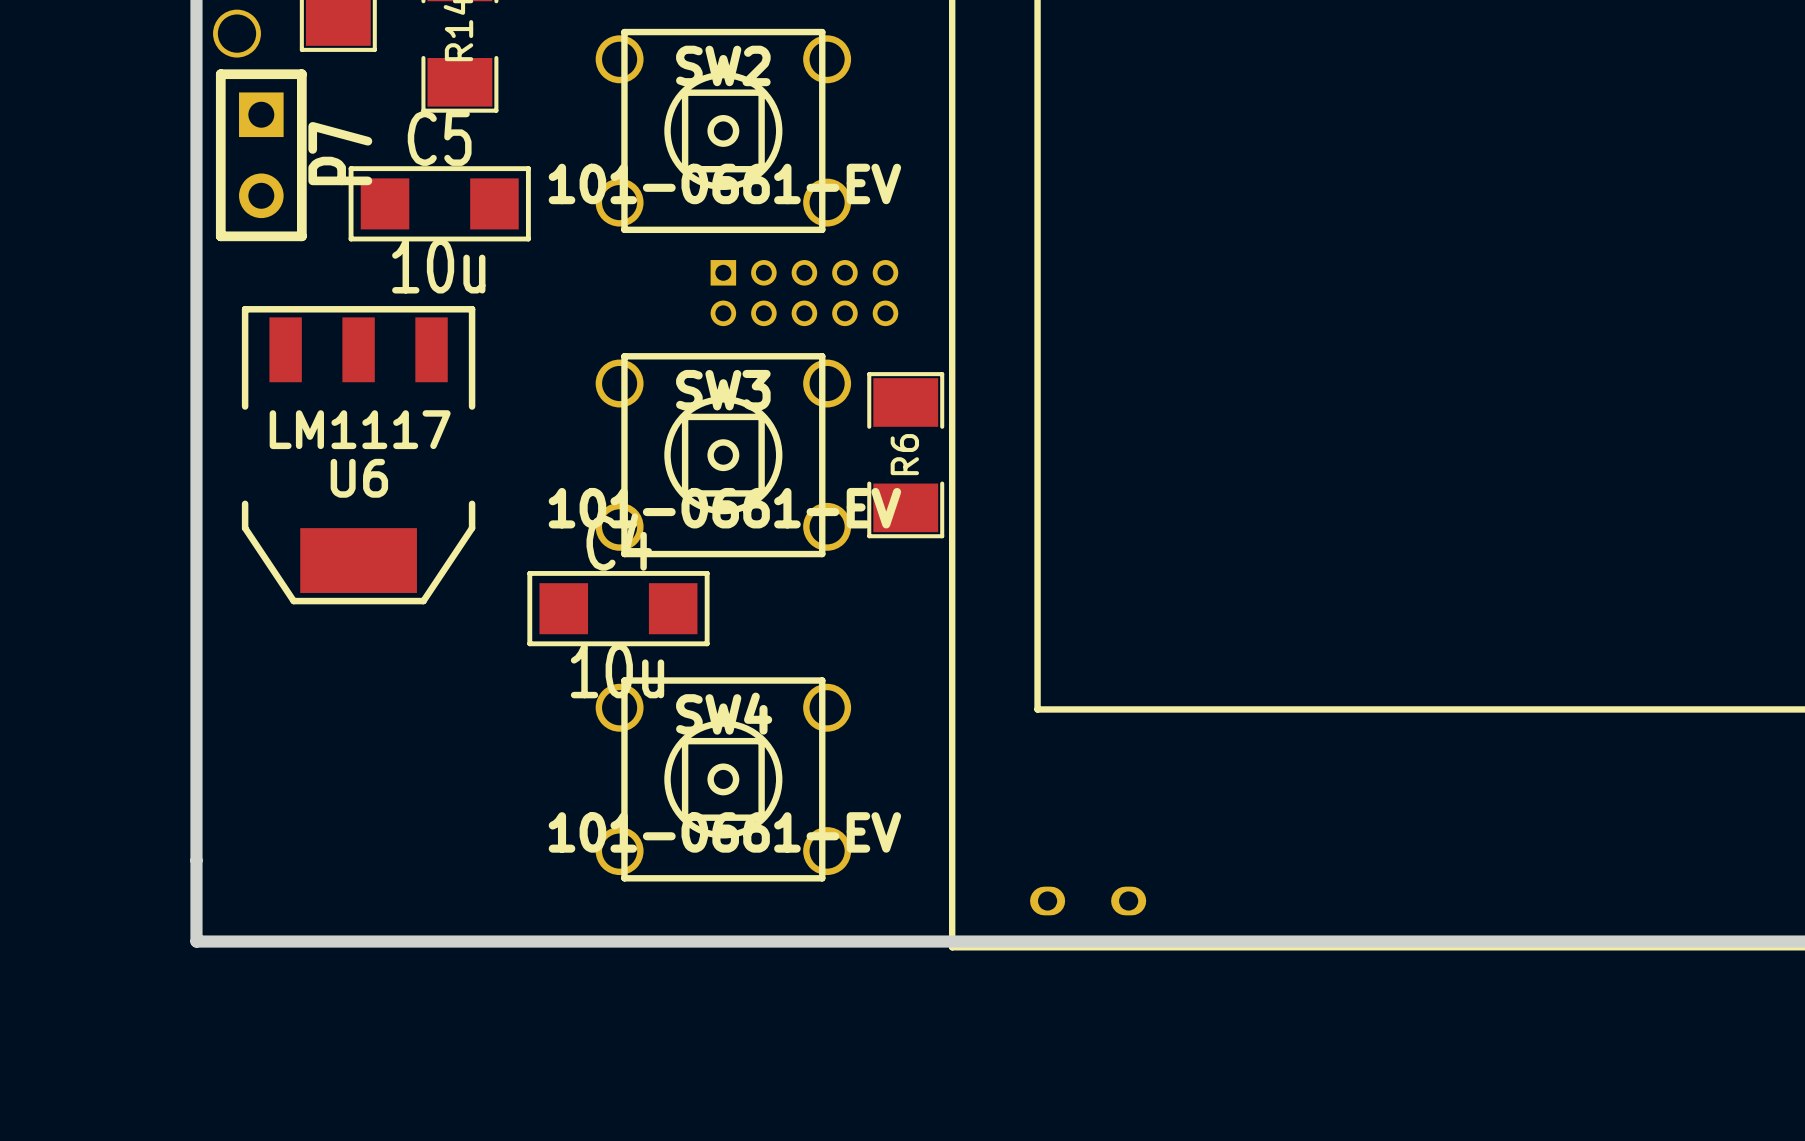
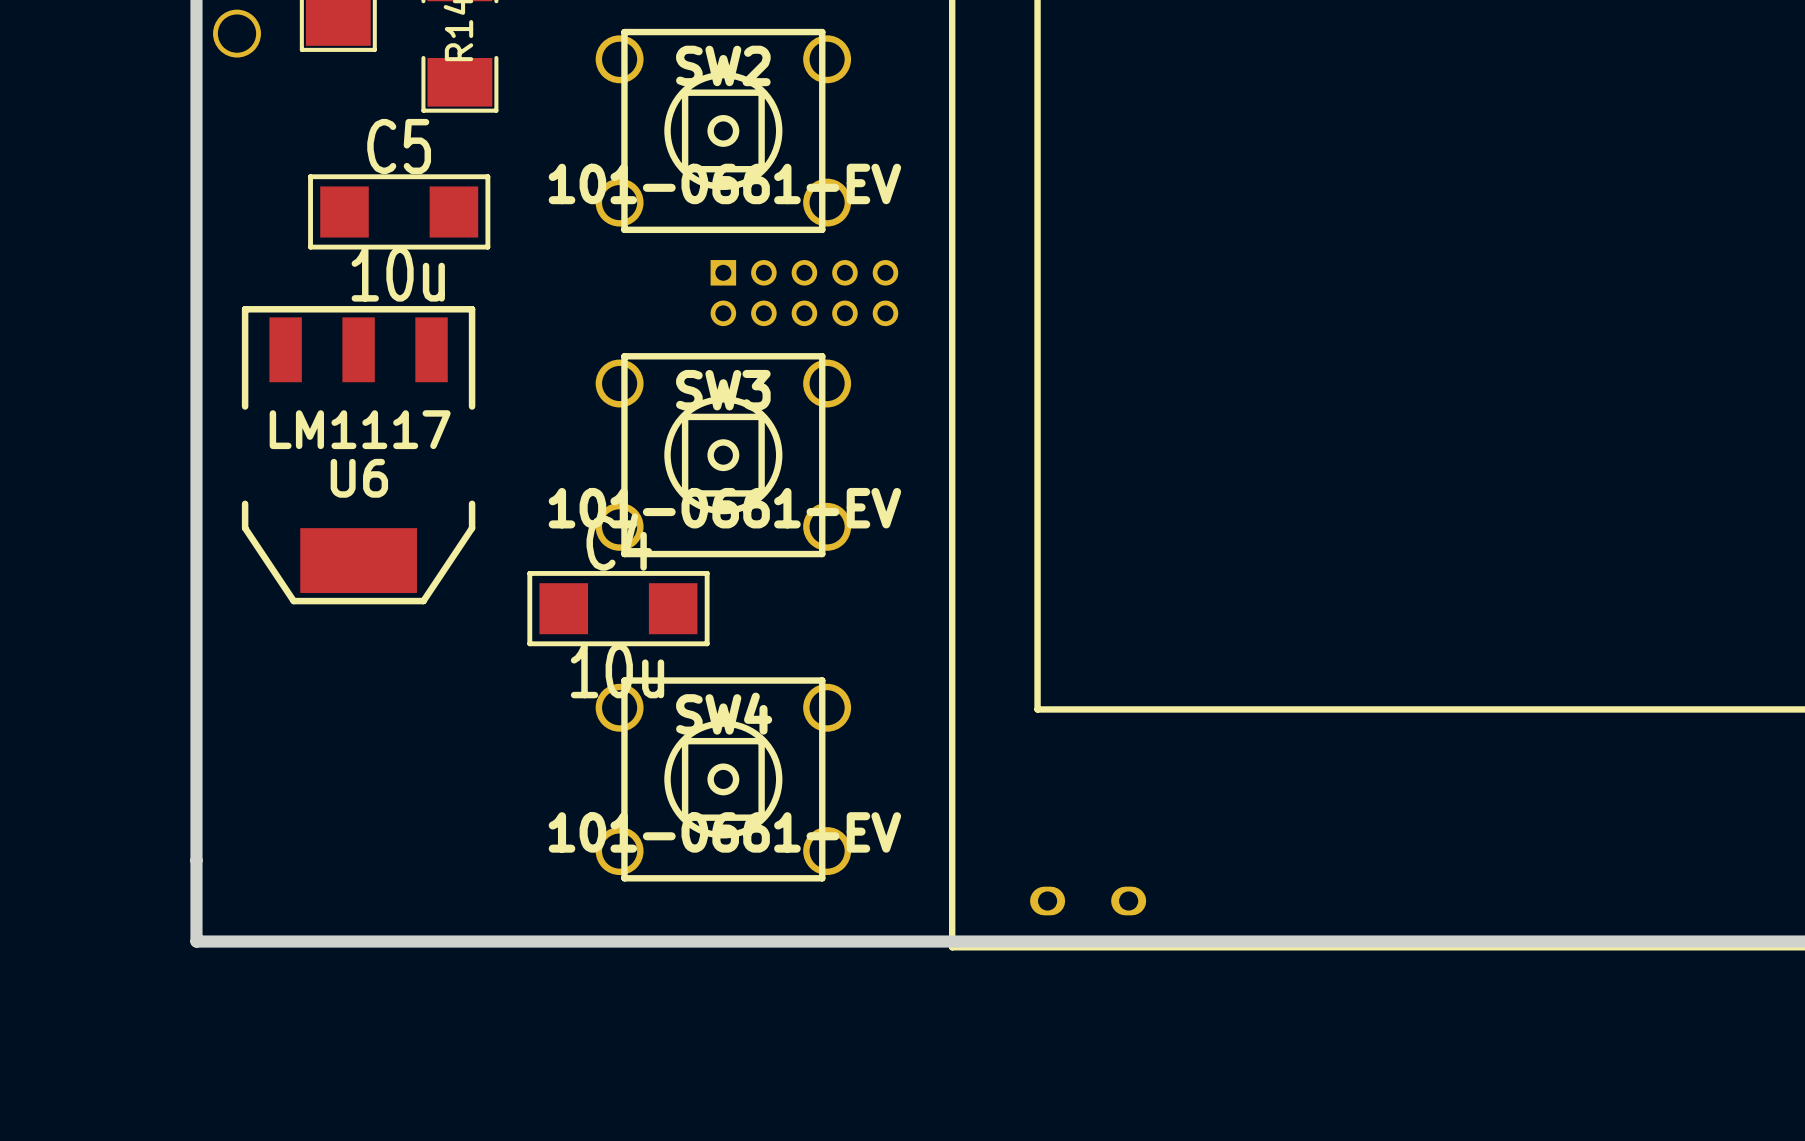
P7: (261, 155) -> none
C5 position: (439, 203) -> (399, 211)
R6: (905, 455) -> none

